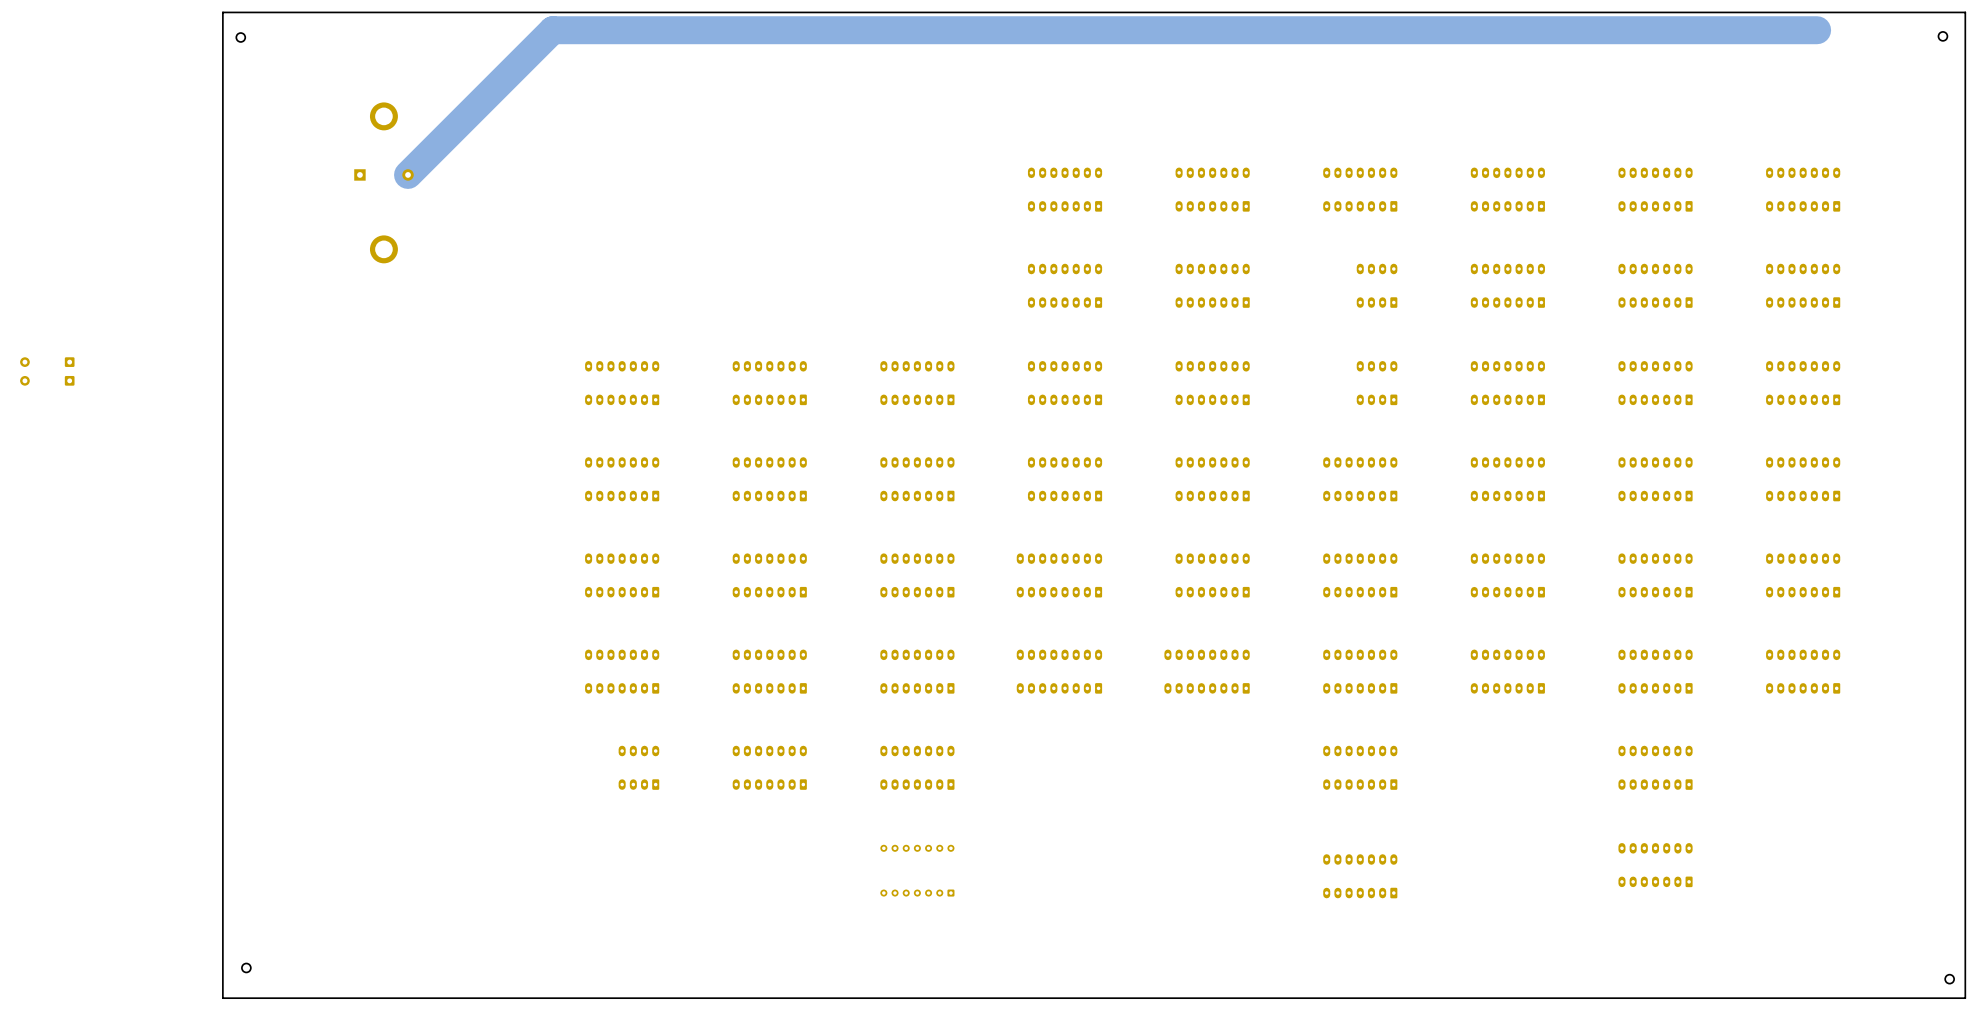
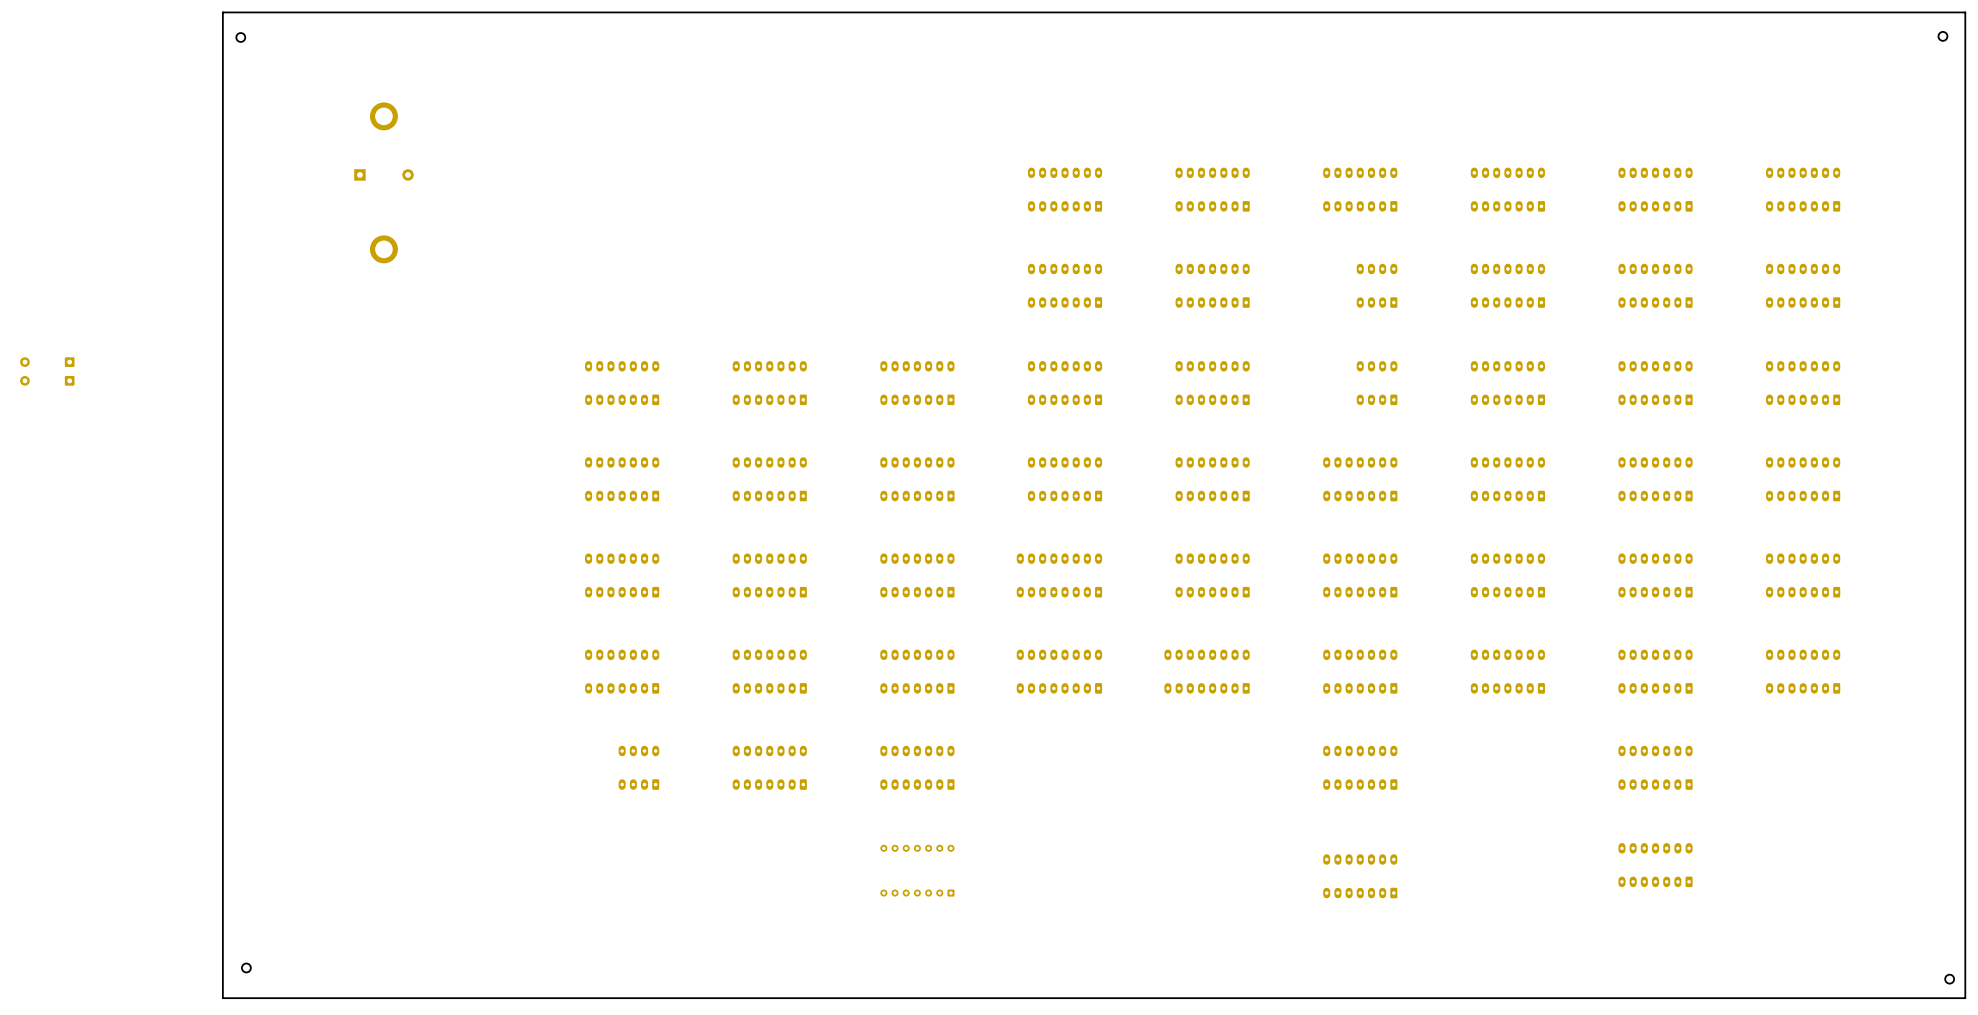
track: (1817, 30) (552, 30) (408, 174) -> none

